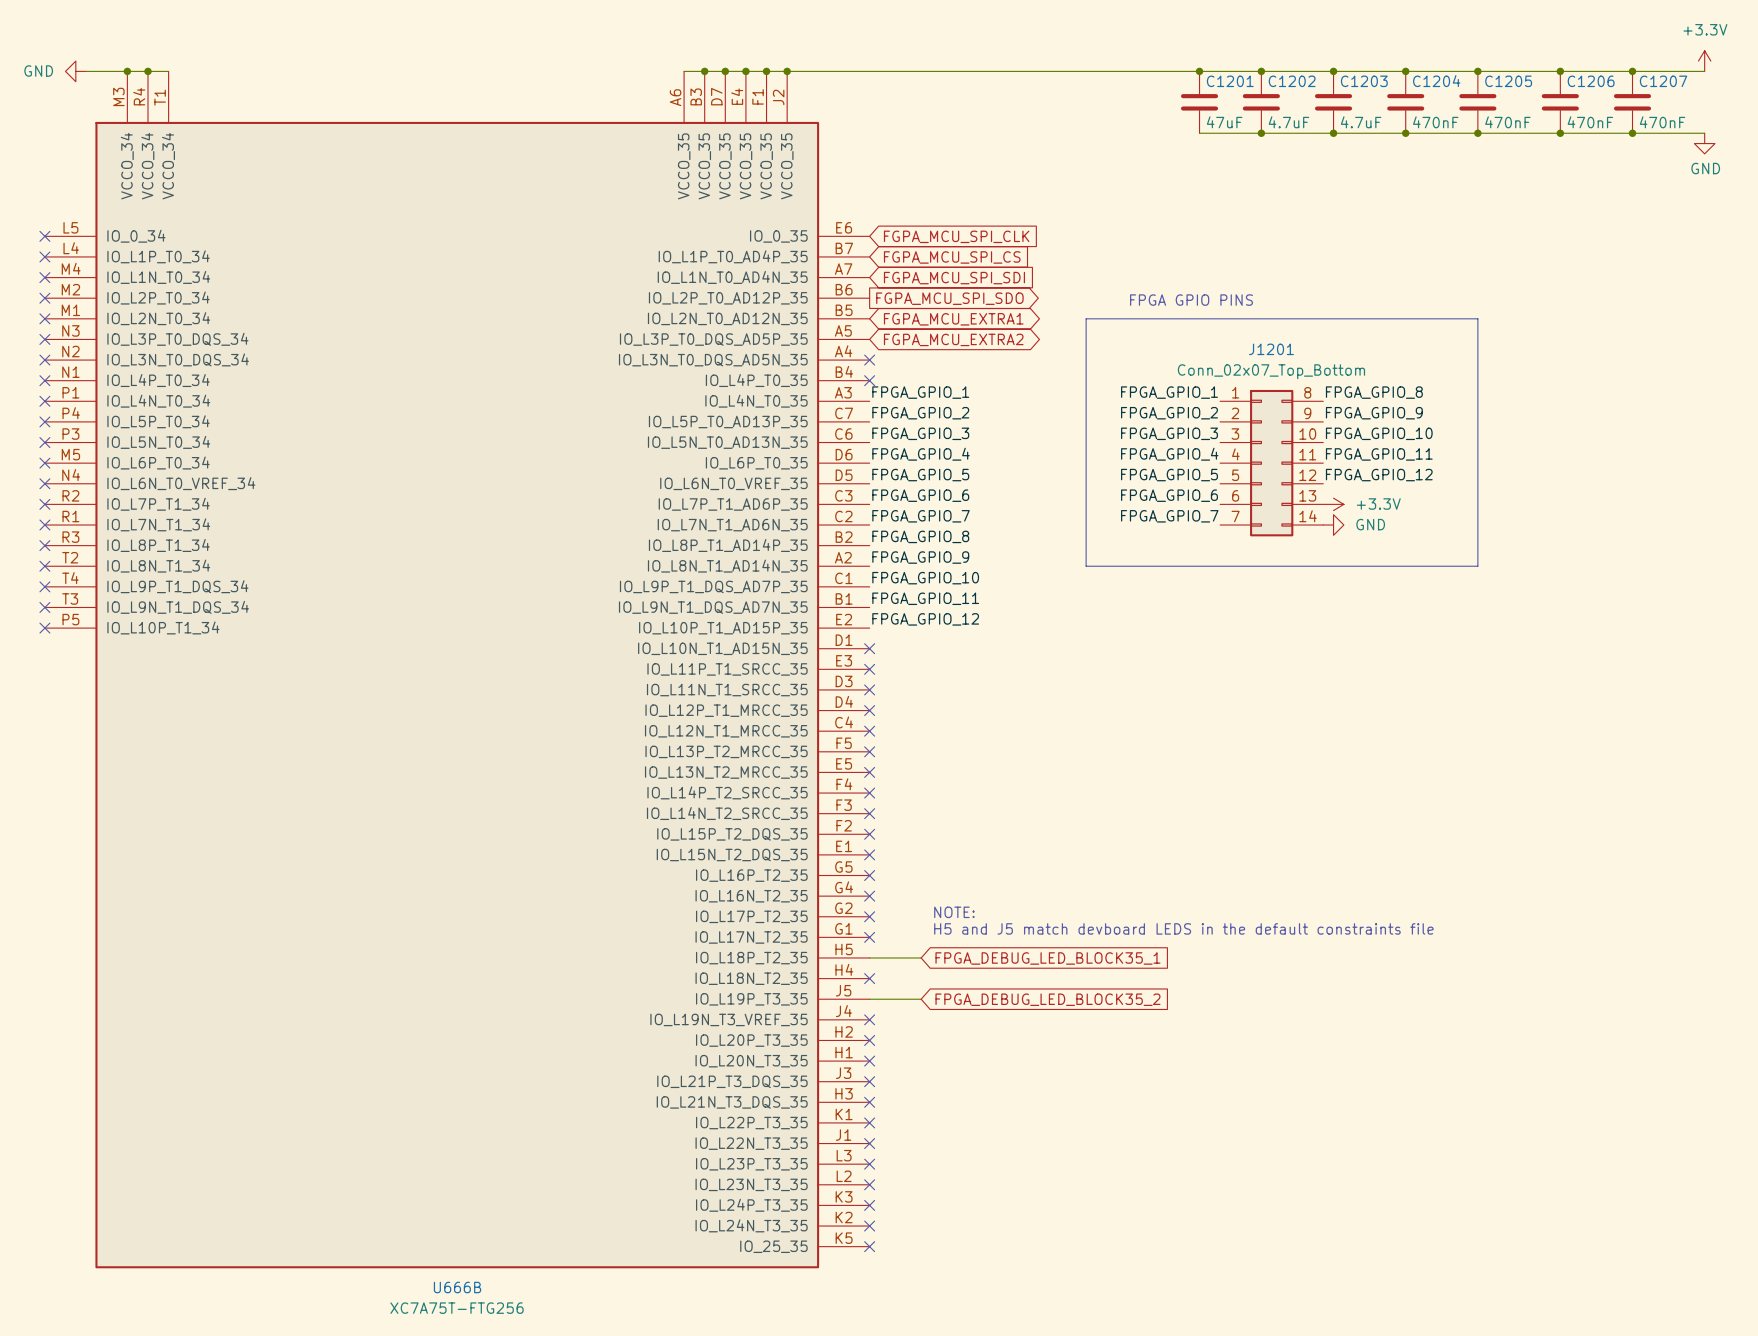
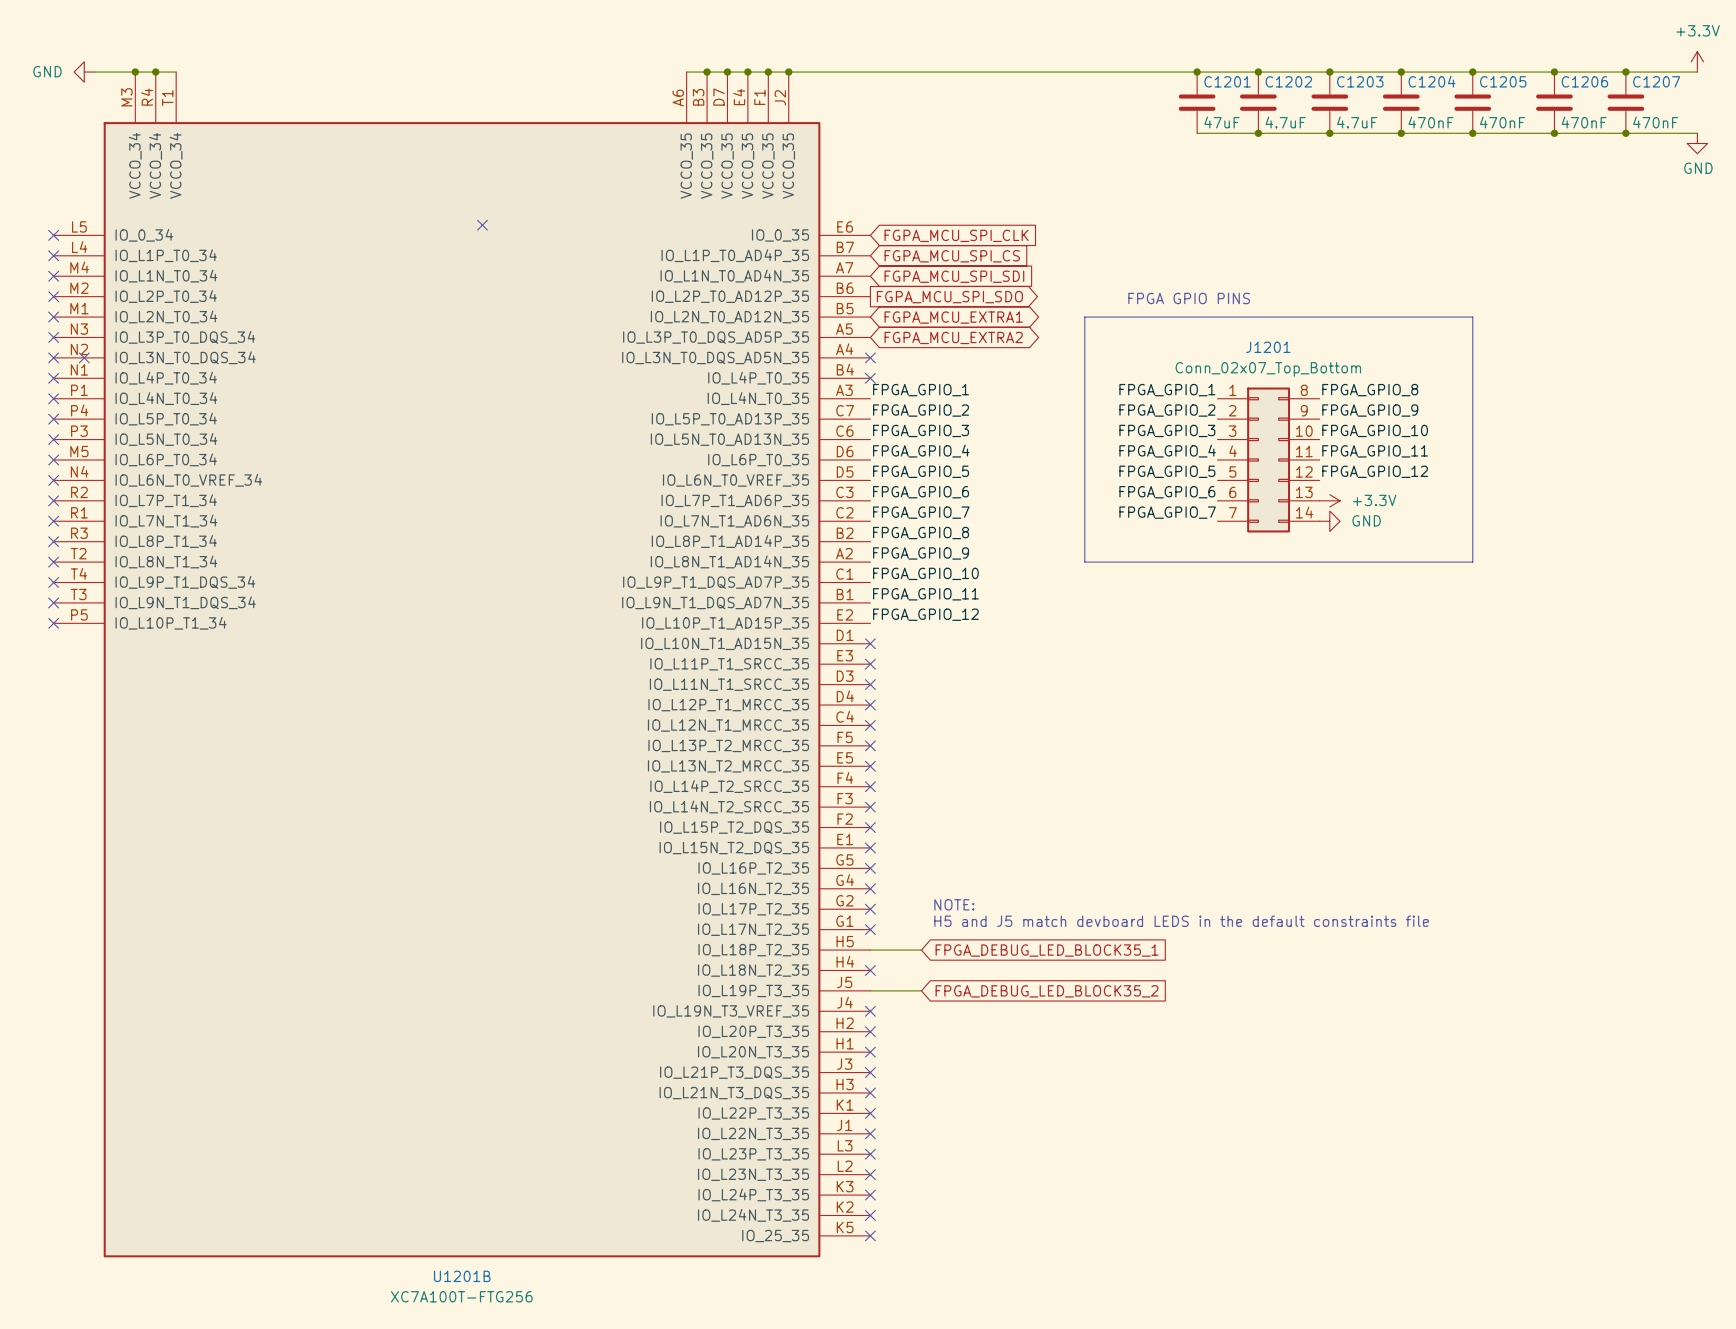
no-connect mark: none -> (482, 225)
no-connect mark: none -> (84, 357)
U666B name: U666B (457, 1287) -> U1201B (462, 1276)
U666B value: XC7A75T-FTG256 (457, 1308) -> XC7A100T-FTG256 (461, 1296)

